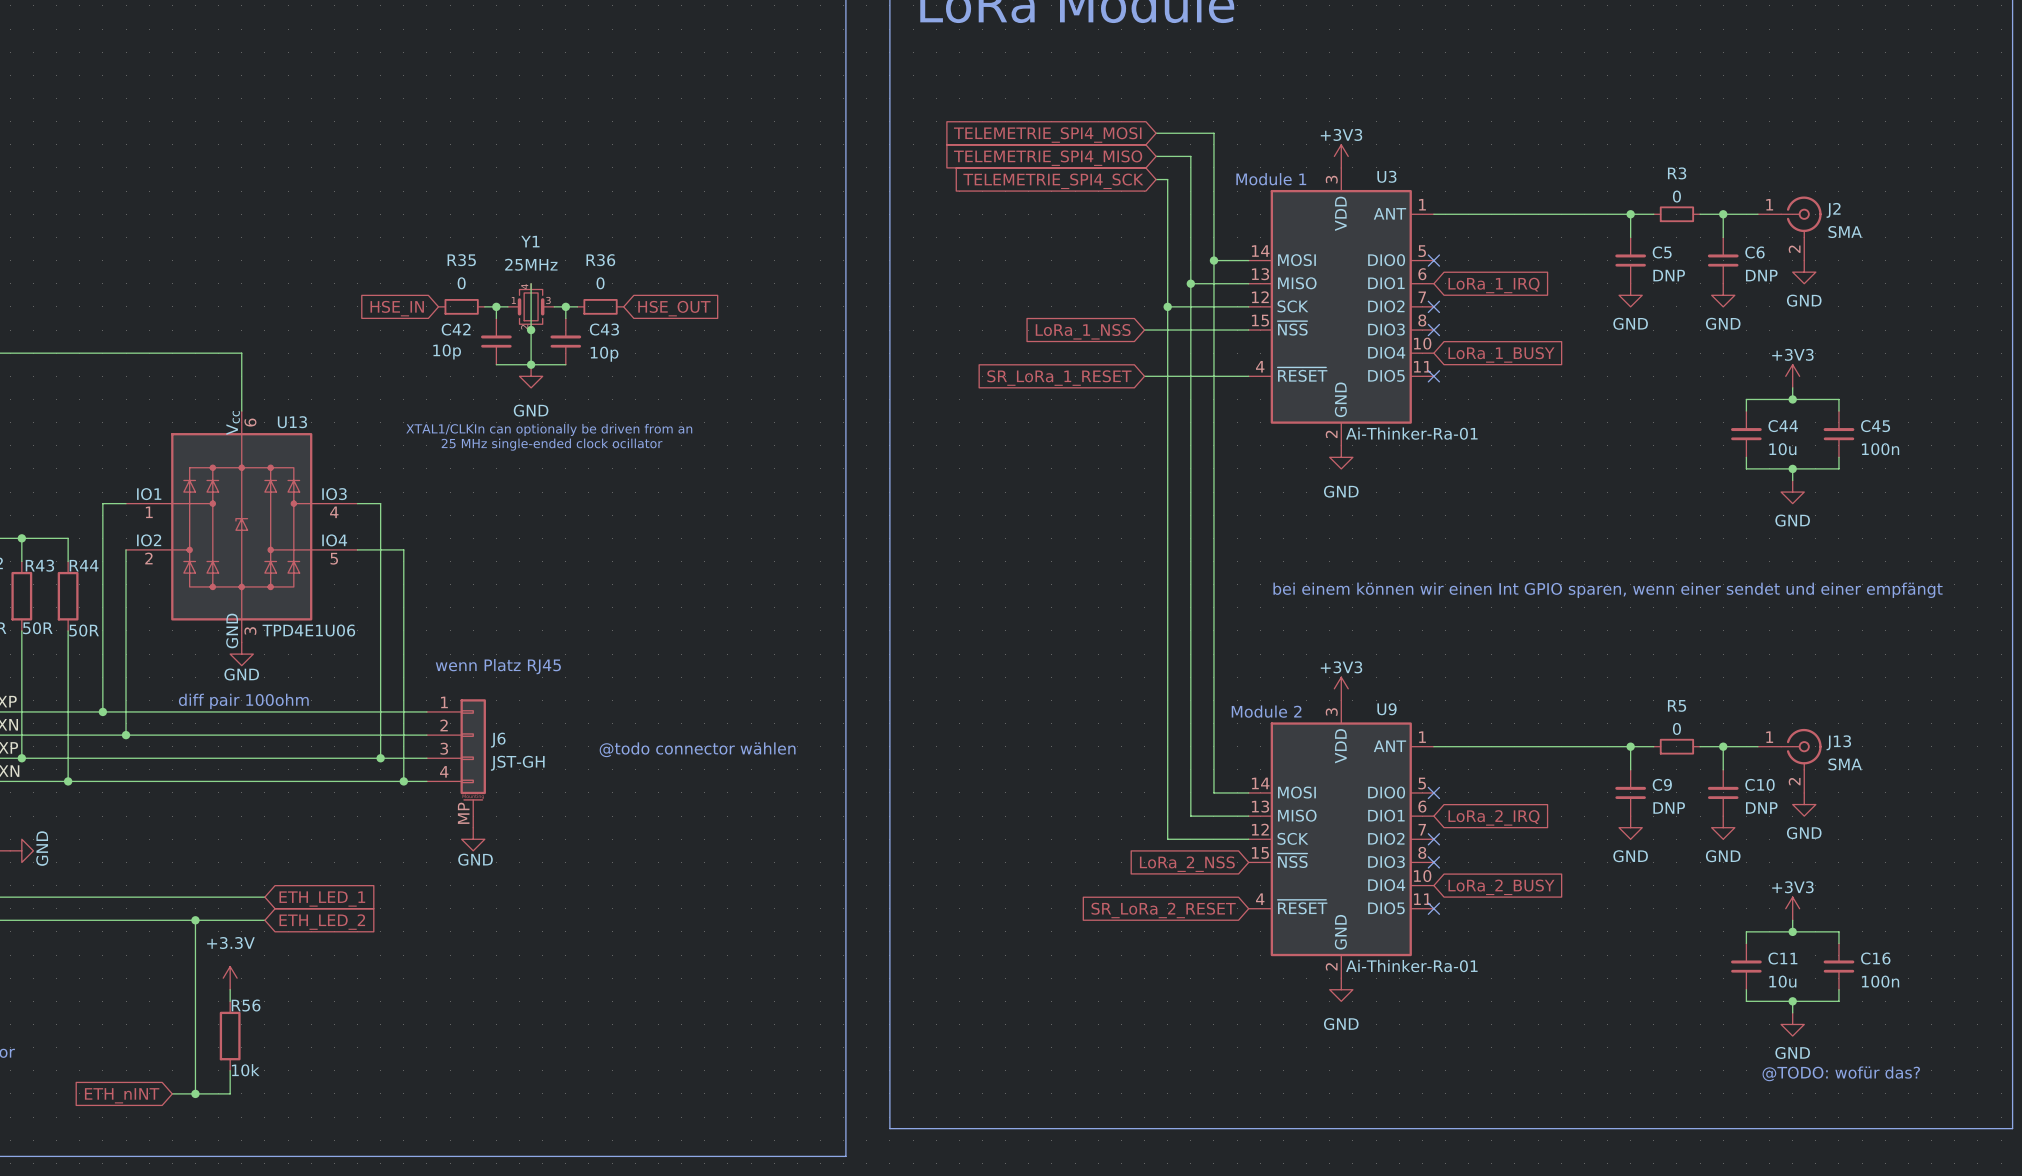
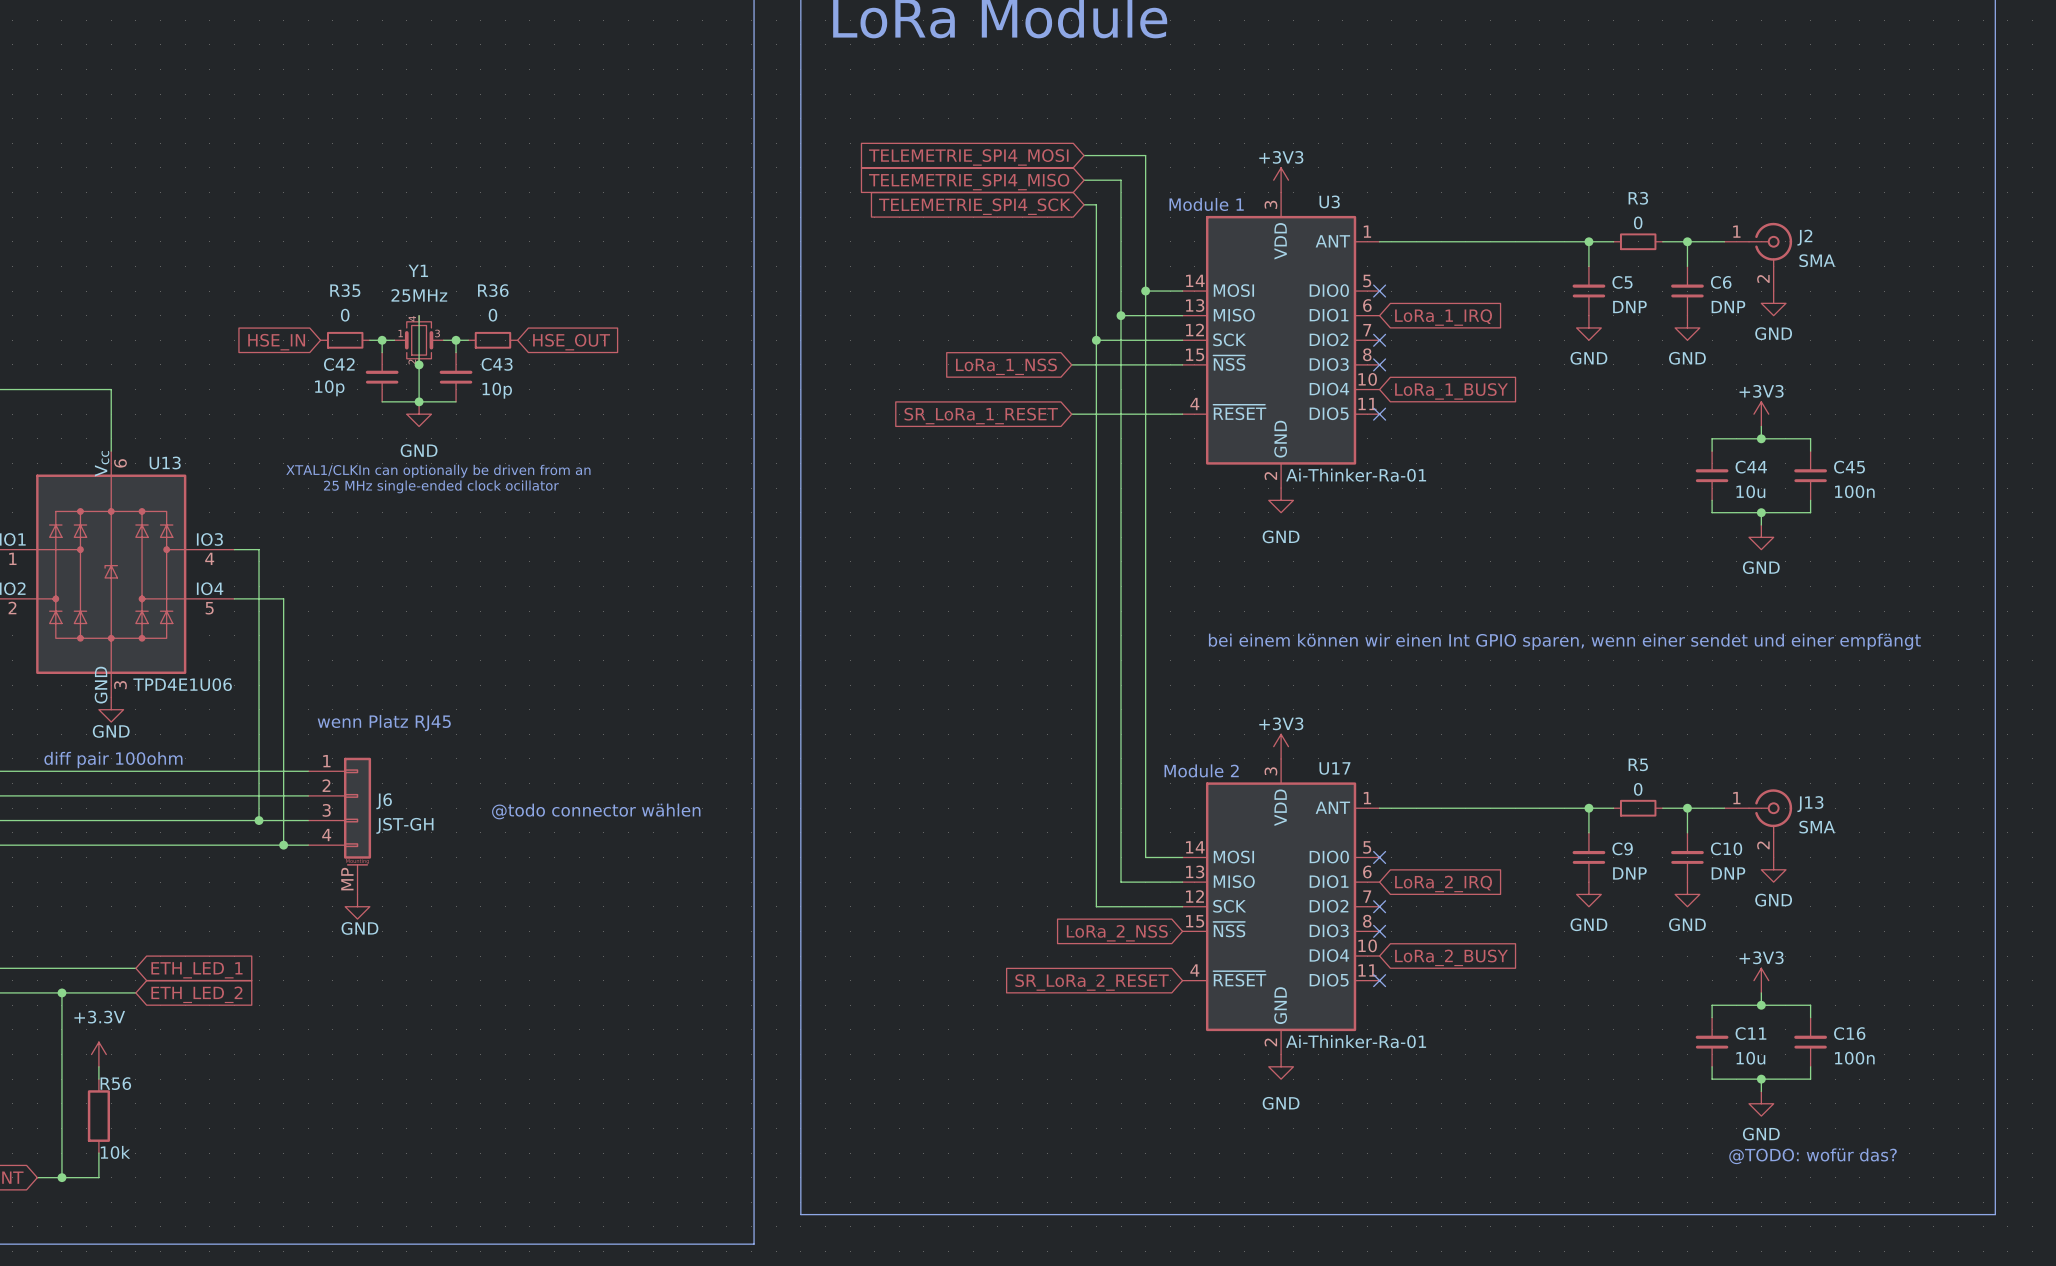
U9 name: U9 (1387, 709) -> U17 (1334, 768)

